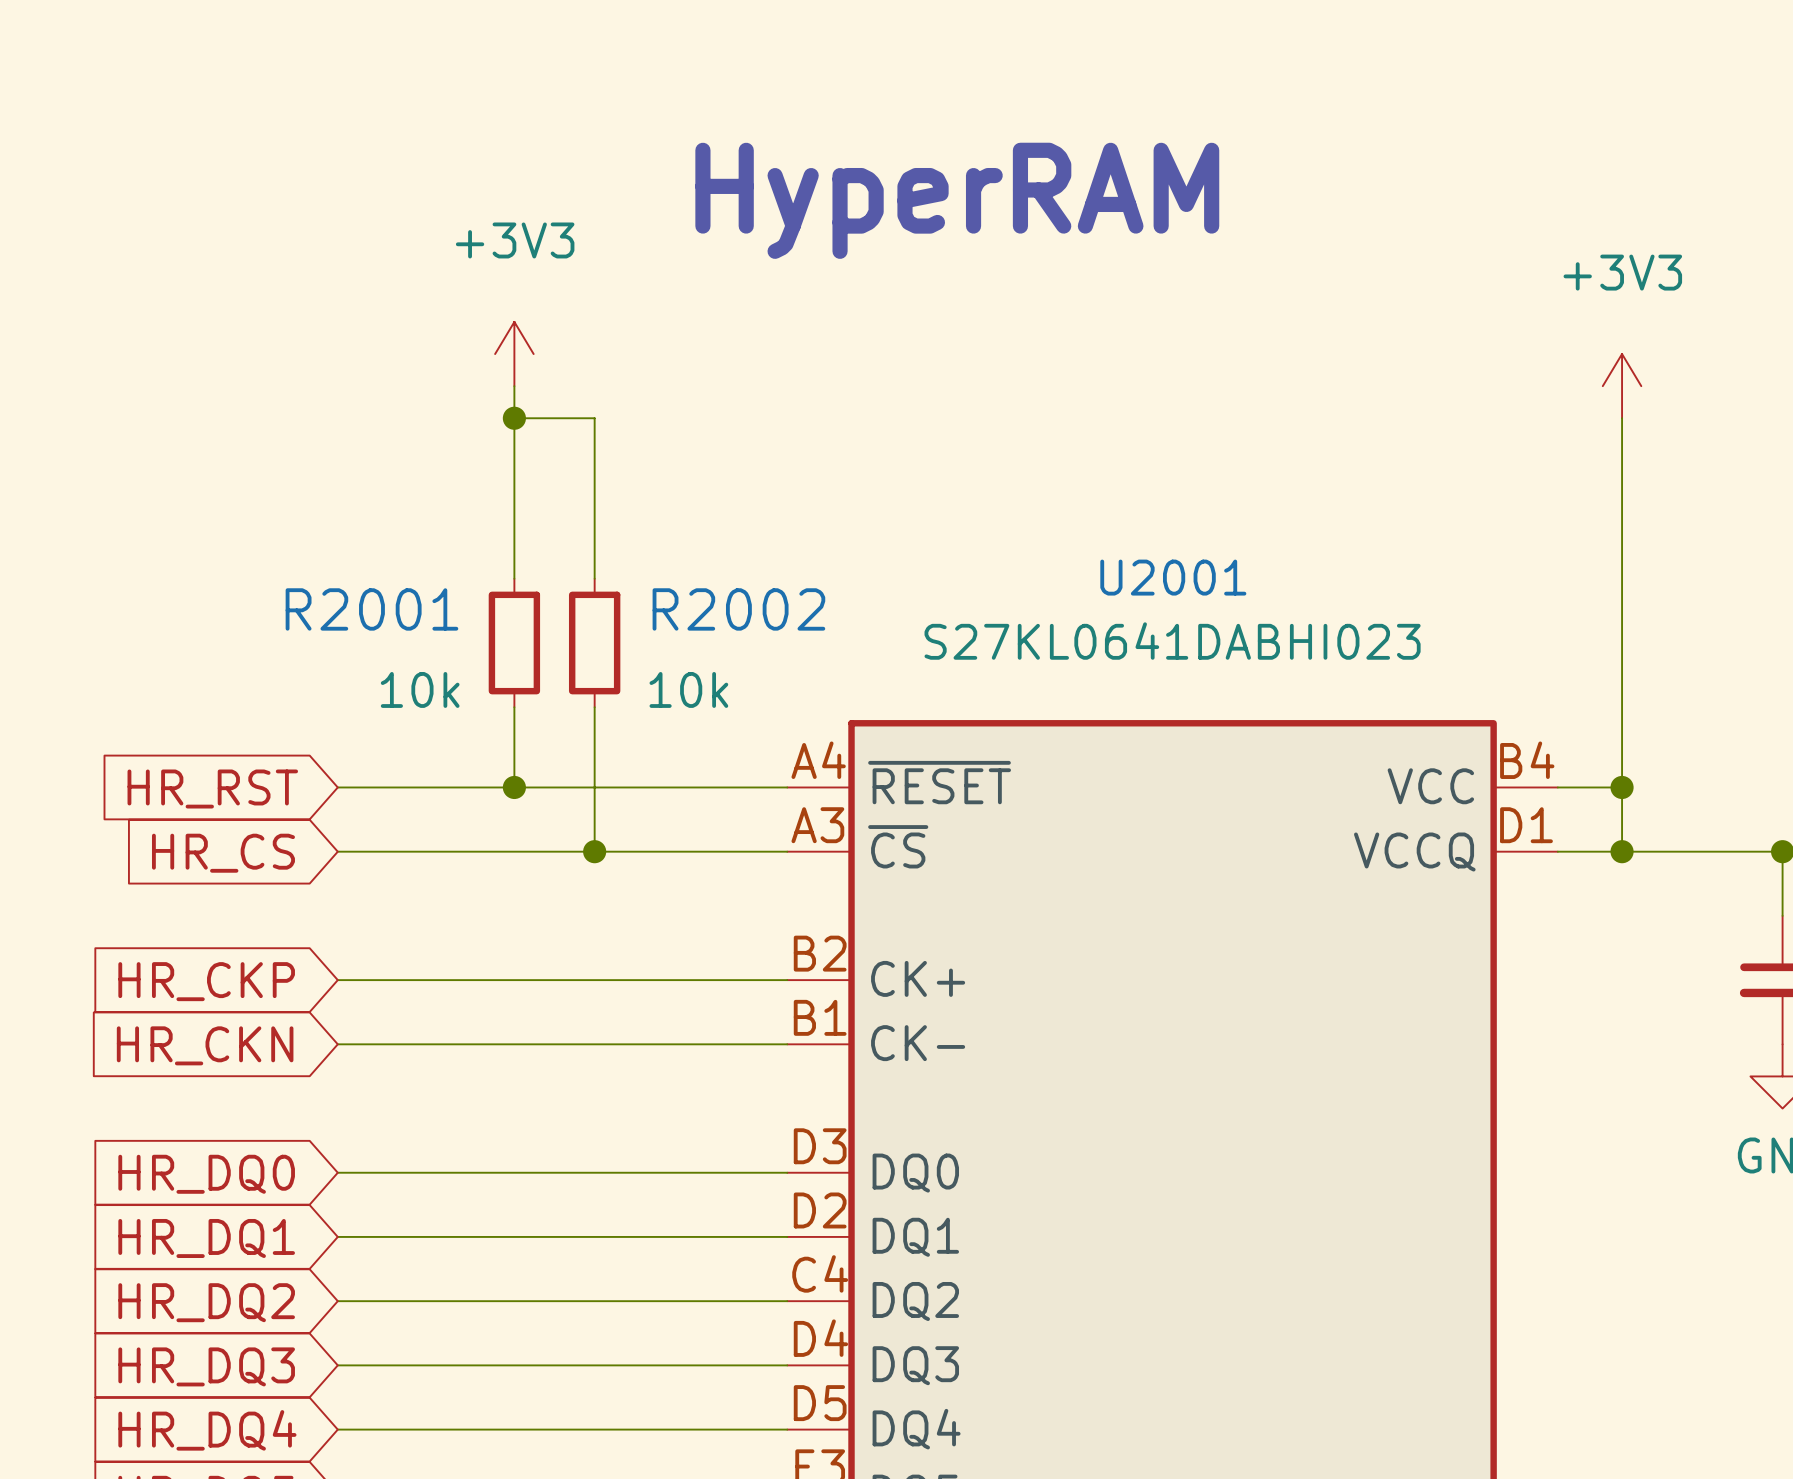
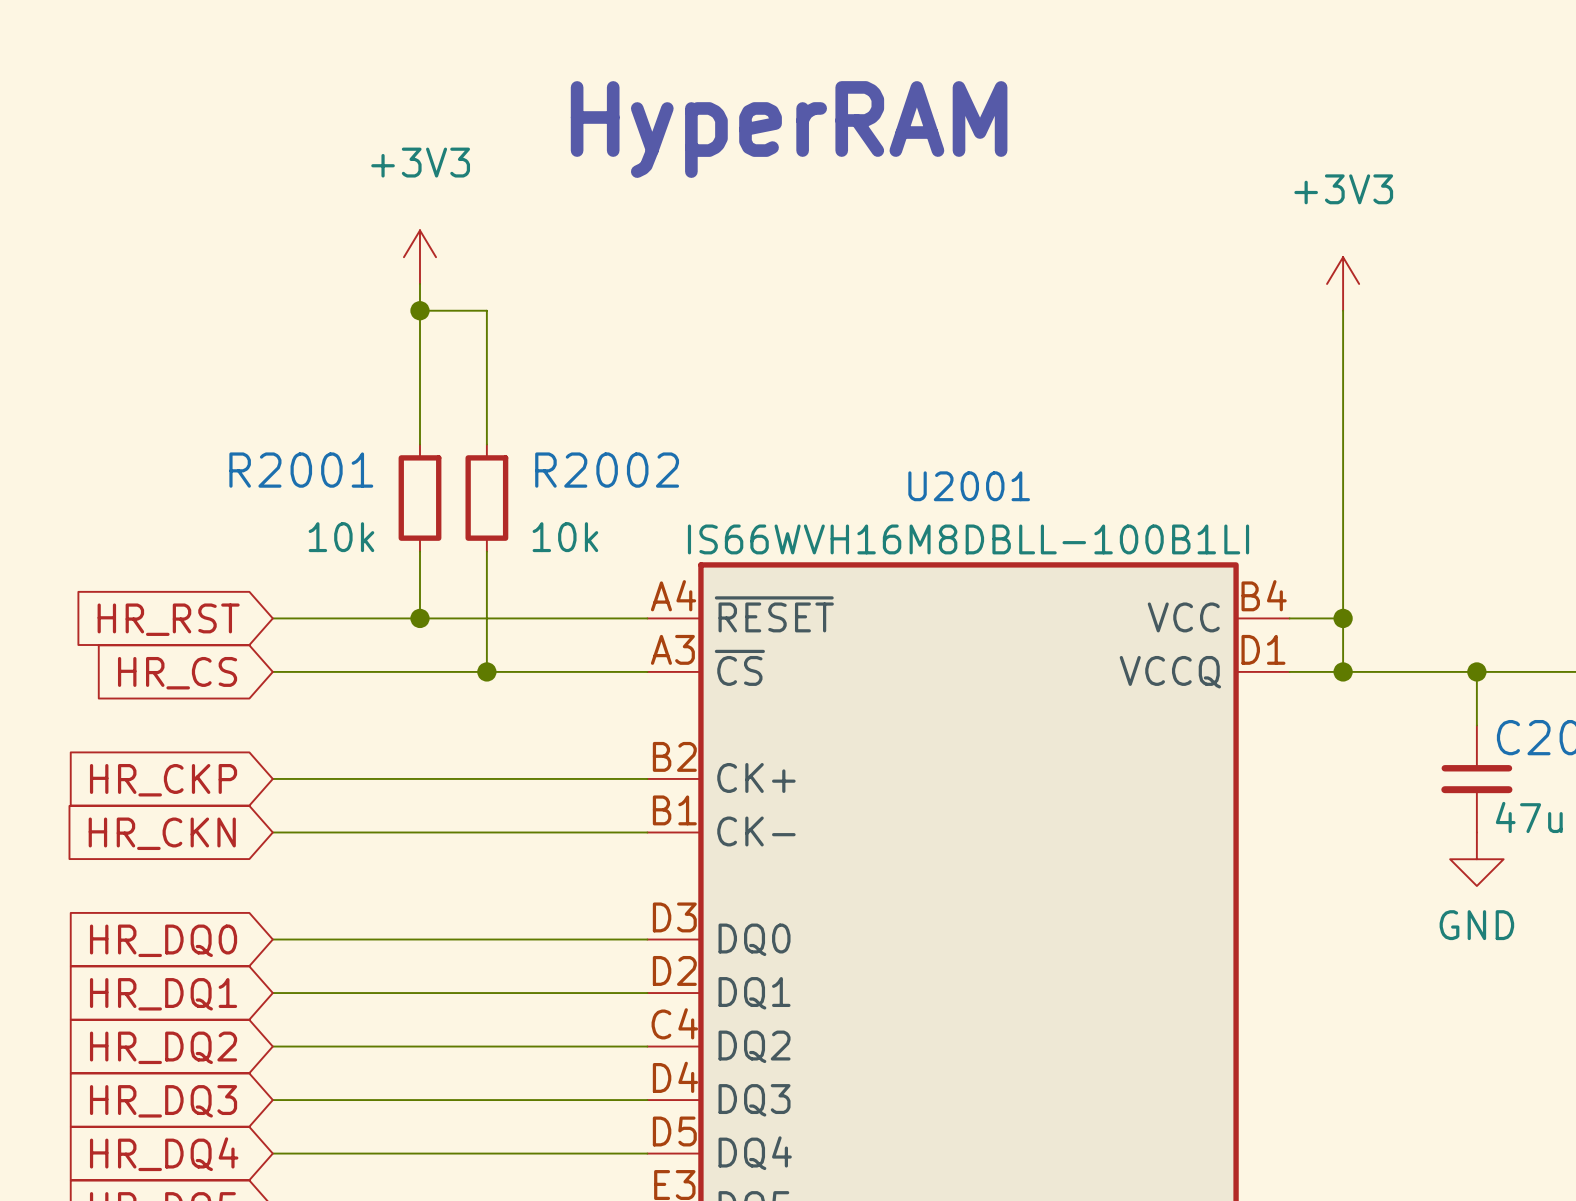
U2001 name position: U2001 (1173, 577) -> U2001 (969, 486)
U2001 text: S27KL0641DABHI023 (1172, 641) -> none
U2001 value: none -> IS66WVH16M8DBLL-100B1LI (968, 539)

